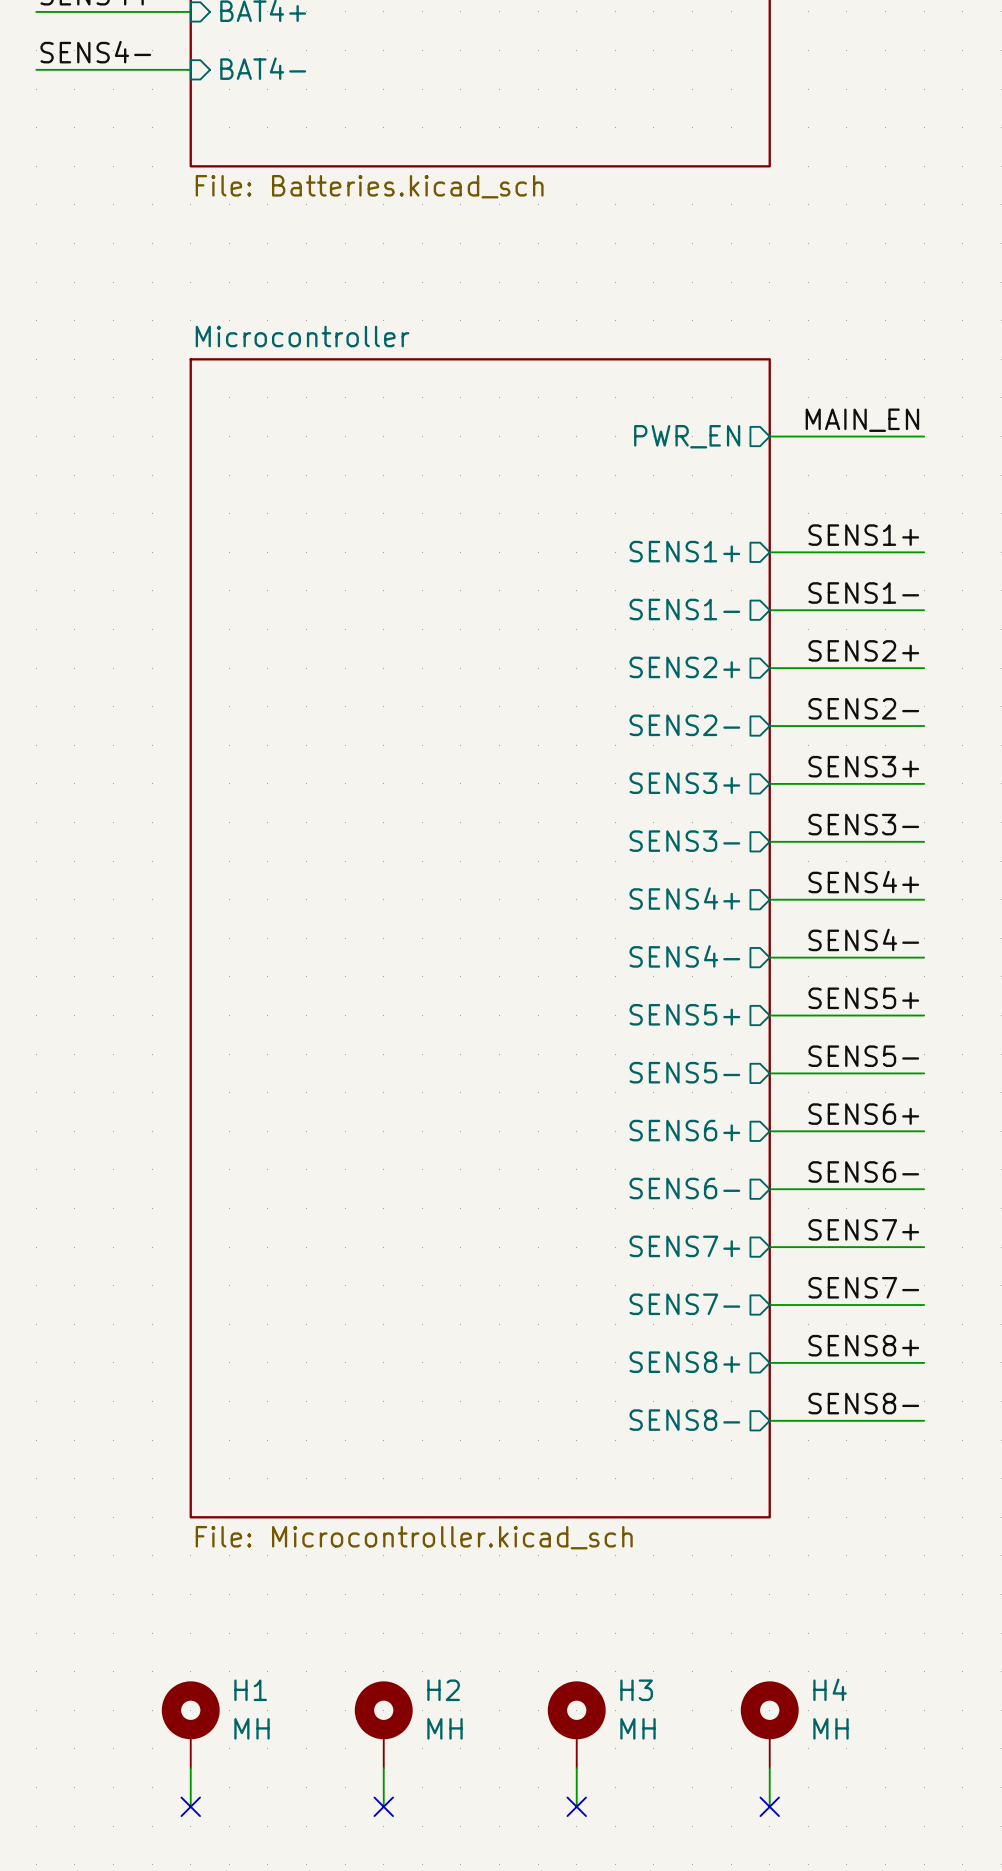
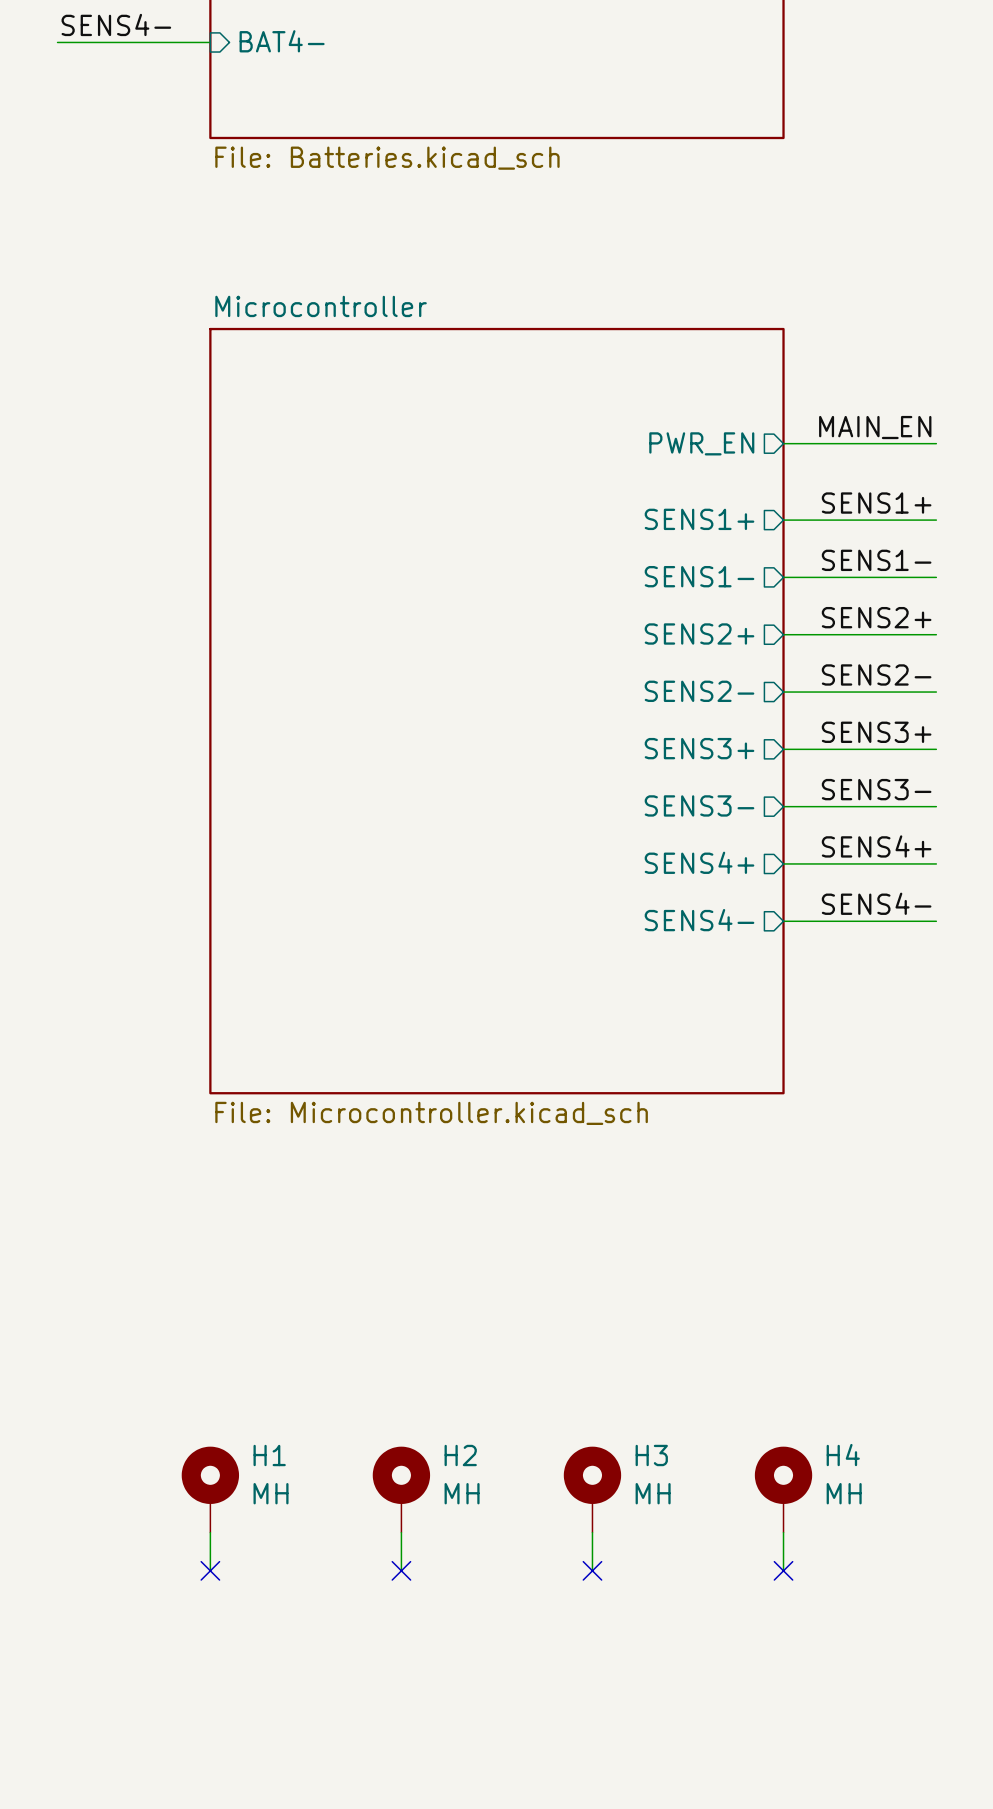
label position: MAIN_EN (862, 420) -> MAIN_EN (875, 427)
sheet pin position: PWR_EN (687, 436) -> PWR_EN (701, 443)
wire: (769, 436) (924, 436) -> (783, 443) (936, 443)
sheet Microcontroller: none -> File: Microcontroller.kicad_sch (496, 711)
sheet Microcontroller: File: Microcontroller.kicad_sch (480, 938) -> none
label: SENS5+ (863, 998) -> none
sheet pin: SENS5+ (684, 1014) -> none
wire: (769, 1015) (924, 1015) -> none
label: SENS5- (863, 1056) -> none
sheet pin: SENS5- (684, 1072) -> none
wire: (769, 1073) (924, 1073) -> none
label: SENS6+ (863, 1114) -> none
sheet pin: SENS6+ (684, 1130) -> none
wire: (769, 1131) (924, 1131) -> none
label: SENS6- (863, 1171) -> none
sheet pin: SENS6- (684, 1188) -> none
wire: (769, 1189) (924, 1189) -> none
label: SENS7+ (863, 1229) -> none
sheet pin: SENS7+ (684, 1246) -> none
wire: (769, 1247) (924, 1247) -> none
label: SENS7- (863, 1287) -> none
sheet pin: SENS7- (684, 1304) -> none
wire: (769, 1305) (924, 1305) -> none
label: SENS8+ (863, 1345) -> none
sheet pin: SENS8+ (684, 1362) -> none
wire: (769, 1362) (924, 1362) -> none
label: SENS8- (863, 1403) -> none
sheet pin: SENS8- (684, 1420) -> none
wire: (769, 1420) (924, 1420) -> none
no-connect mark: none -> (210, 1570)
no-connect mark: none -> (401, 1570)
no-connect mark: none -> (592, 1570)
no-connect mark: none -> (783, 1570)
H1 position: (190, 1724) -> (210, 1489)
H2 position: (383, 1724) -> (401, 1489)
H3 position: (576, 1724) -> (592, 1489)
H4 position: (769, 1724) -> (783, 1489)
wire: (190, 1768) (190, 1806) -> (210, 1532) (210, 1570)
wire: (383, 1768) (383, 1806) -> (401, 1532) (401, 1570)
wire: (576, 1768) (576, 1806) -> (592, 1532) (592, 1570)
wire: (769, 1768) (769, 1806) -> (783, 1532) (783, 1570)
no-connect mark: (190, 1806) -> none
no-connect mark: (383, 1806) -> none
no-connect mark: (576, 1806) -> none
no-connect mark: (769, 1806) -> none

